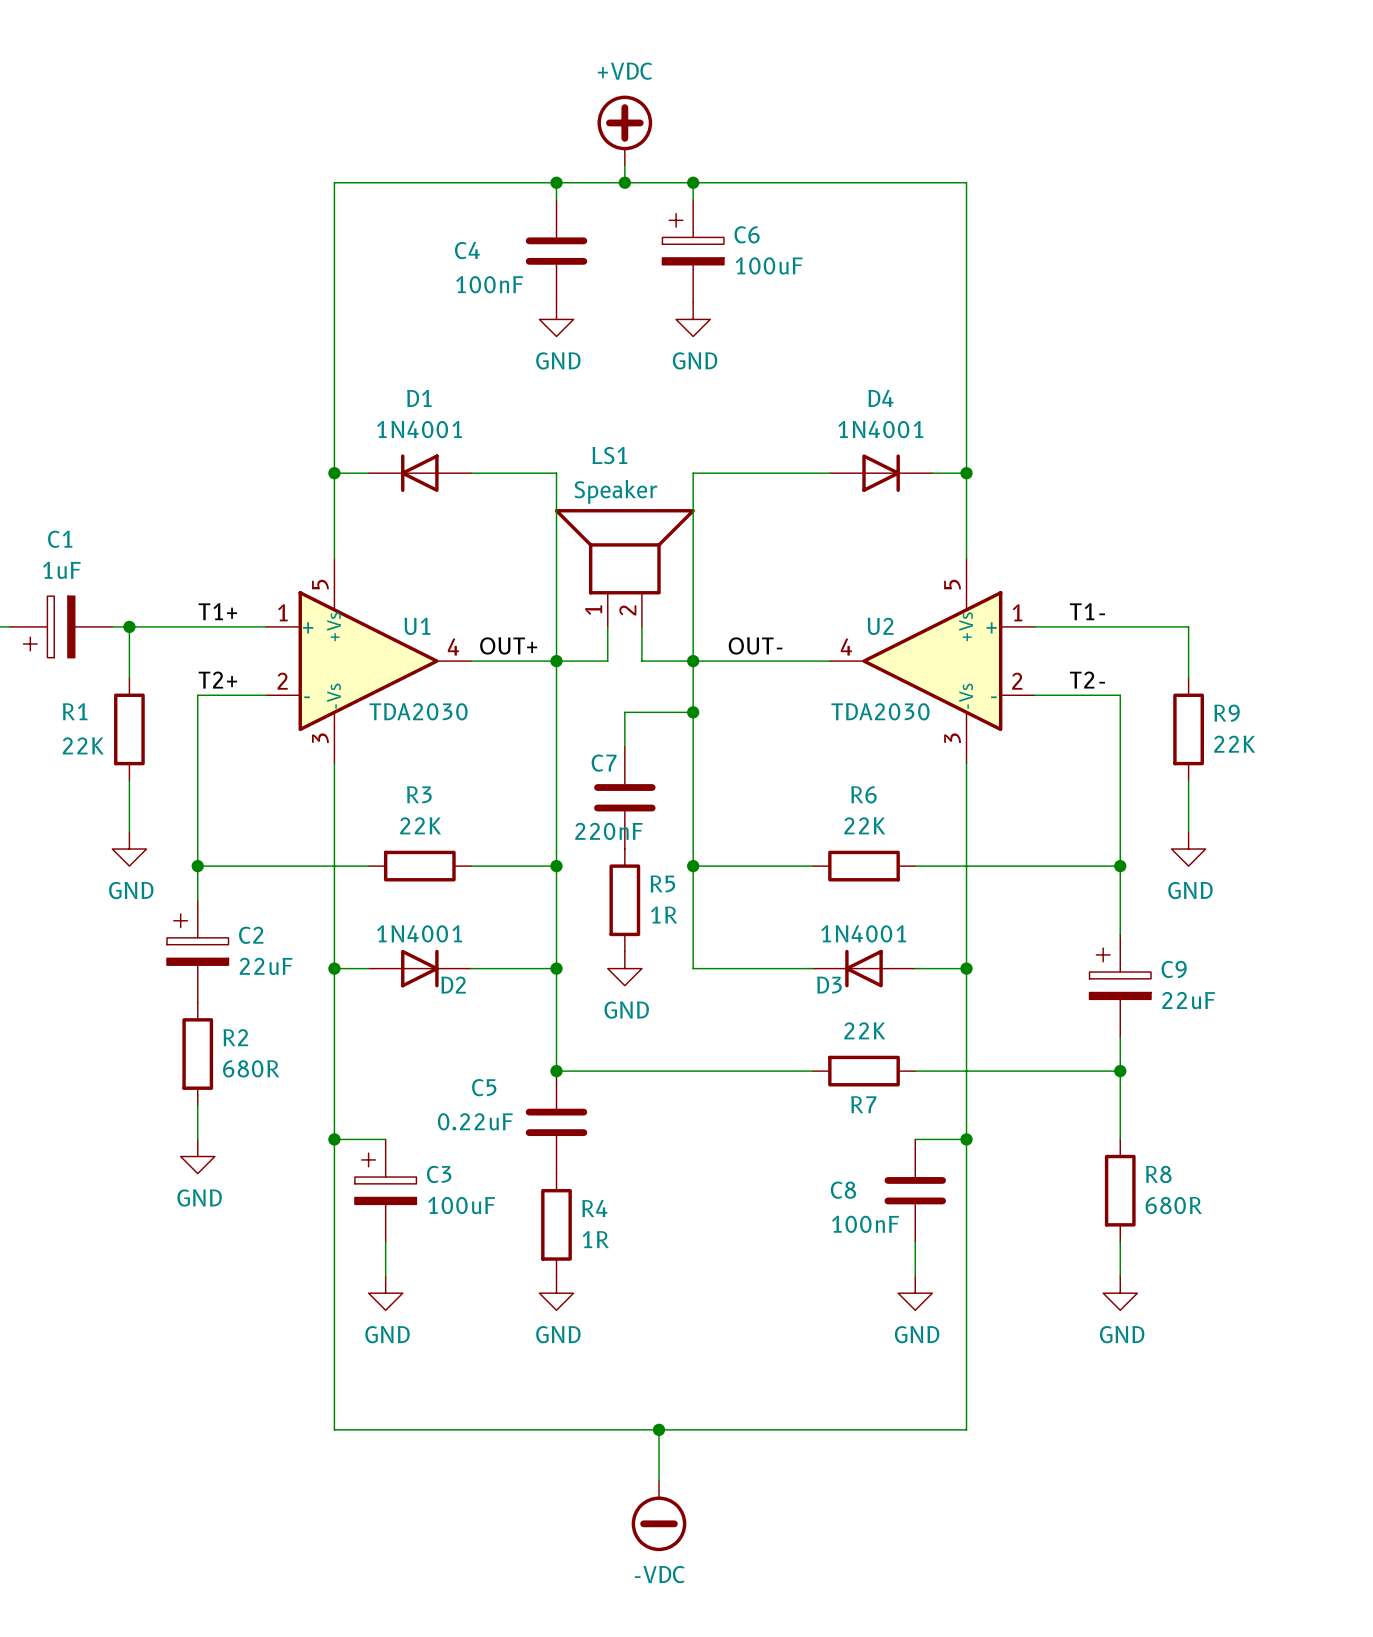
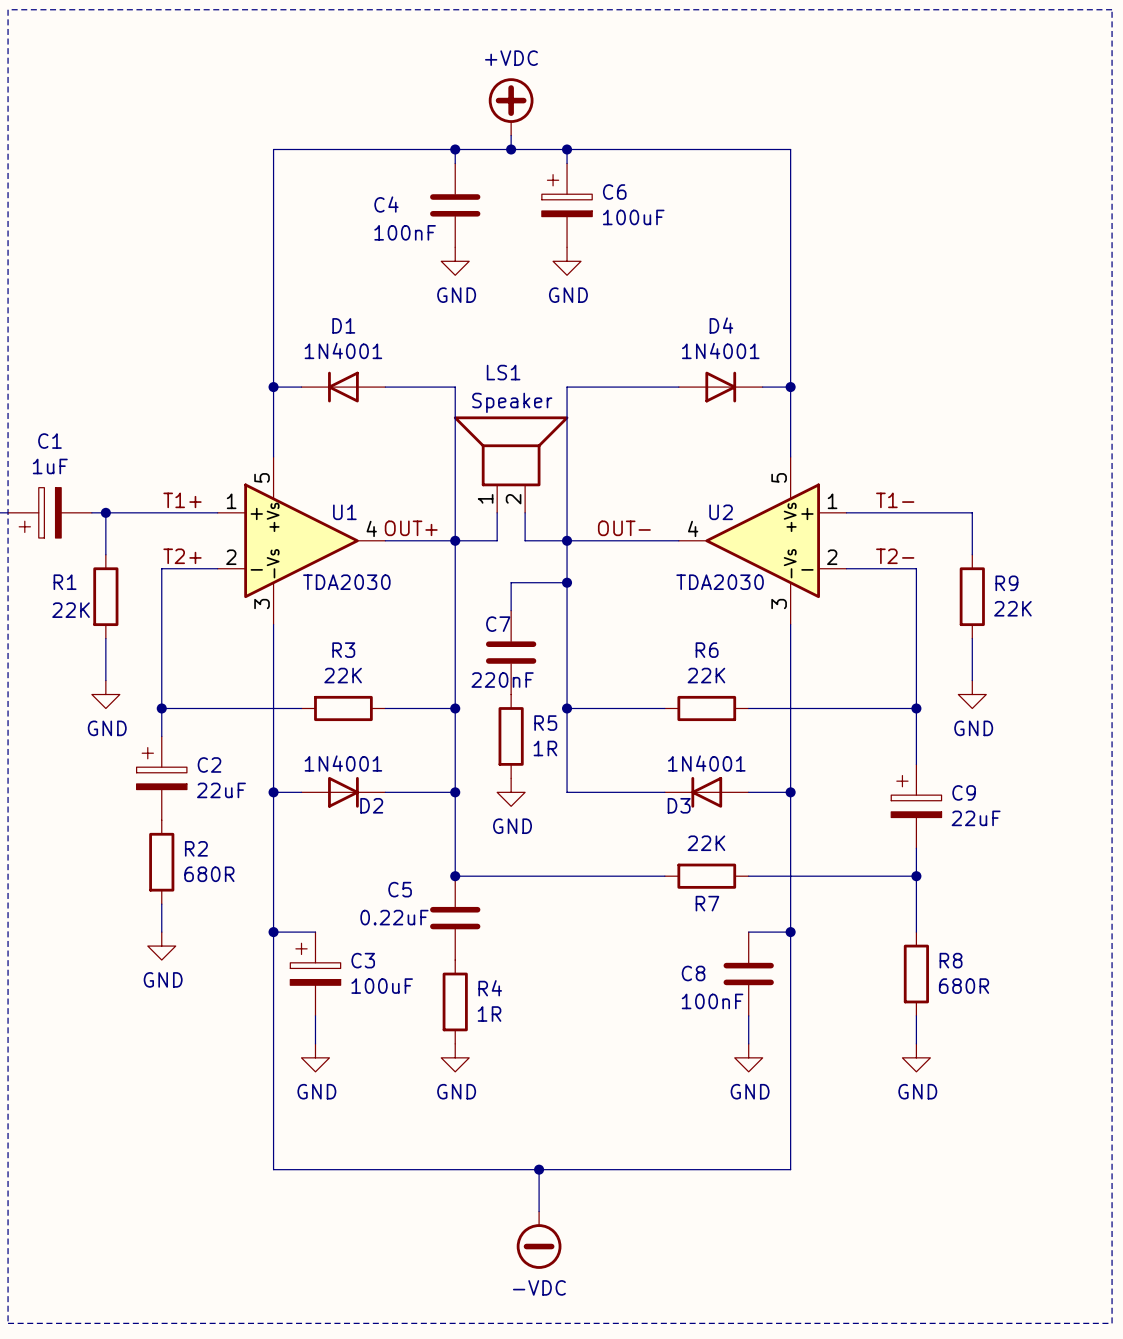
line: none -> (8, 9) (1112, 9) (1112, 1323) (8, 1323) (8, 9)

